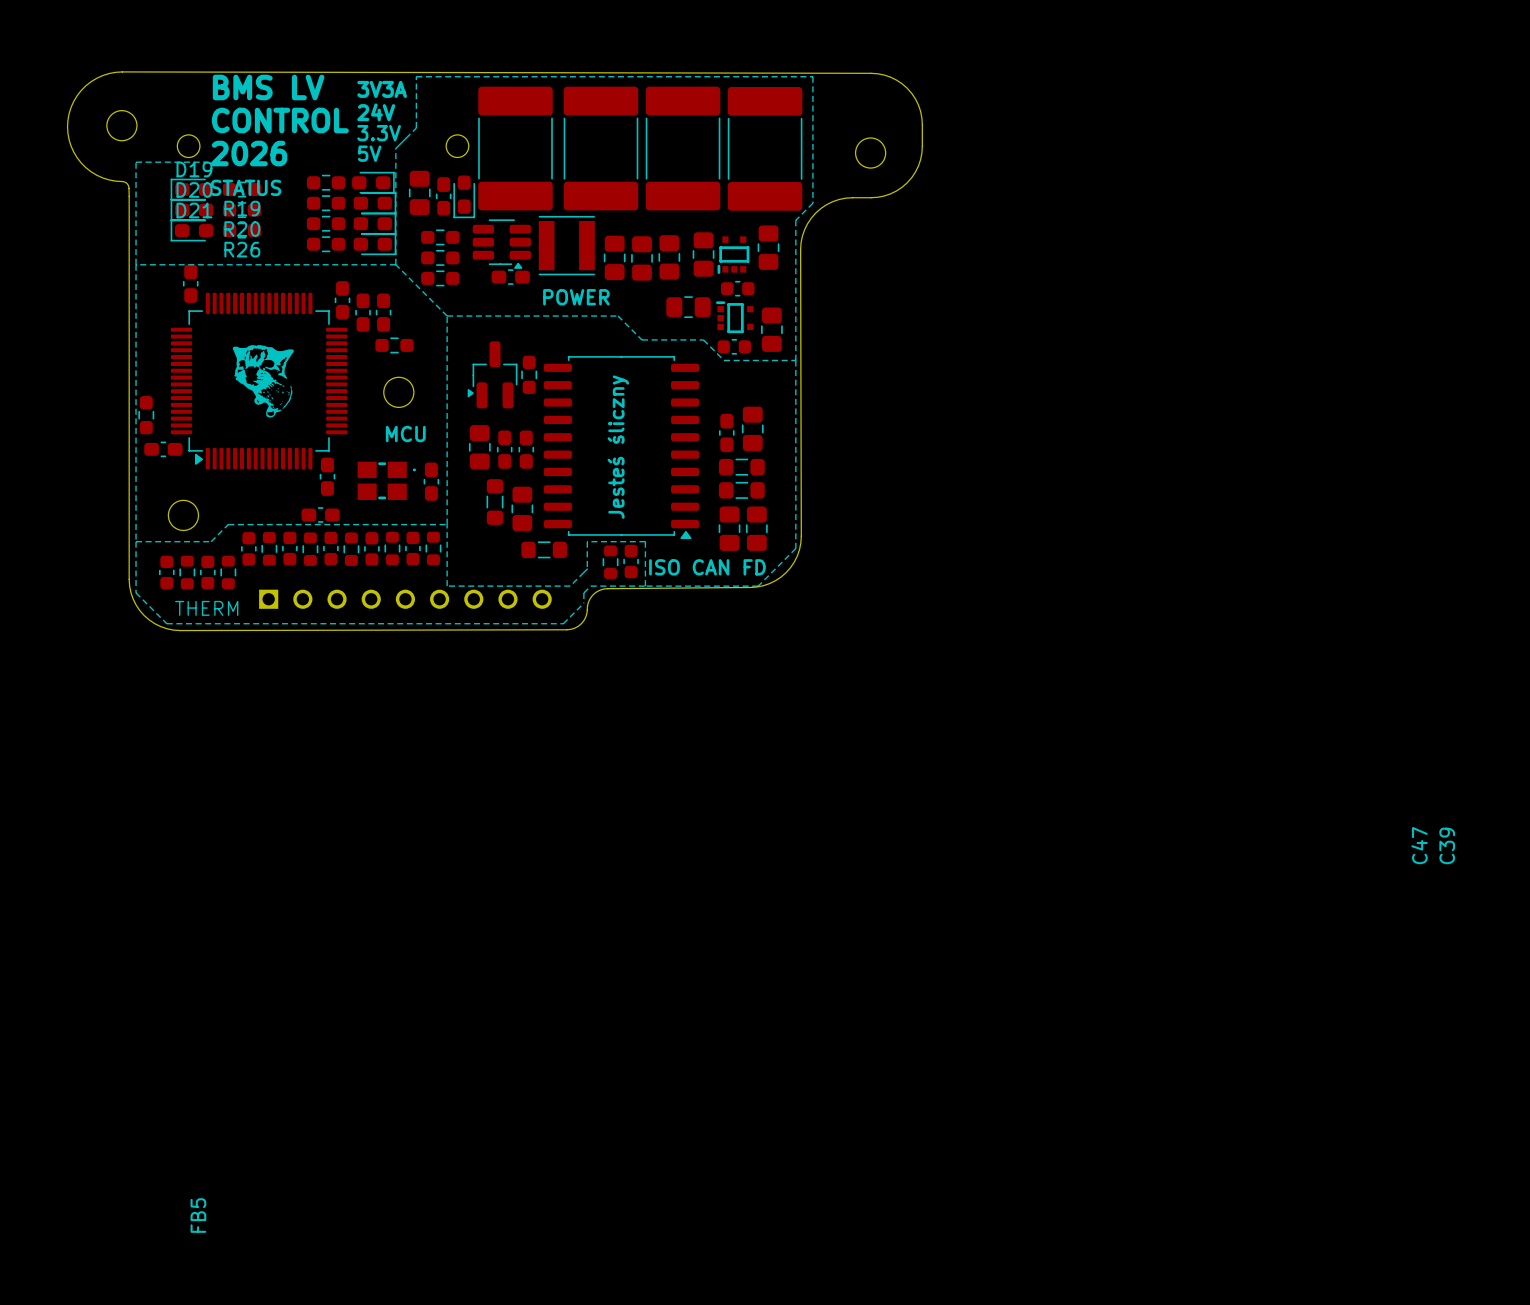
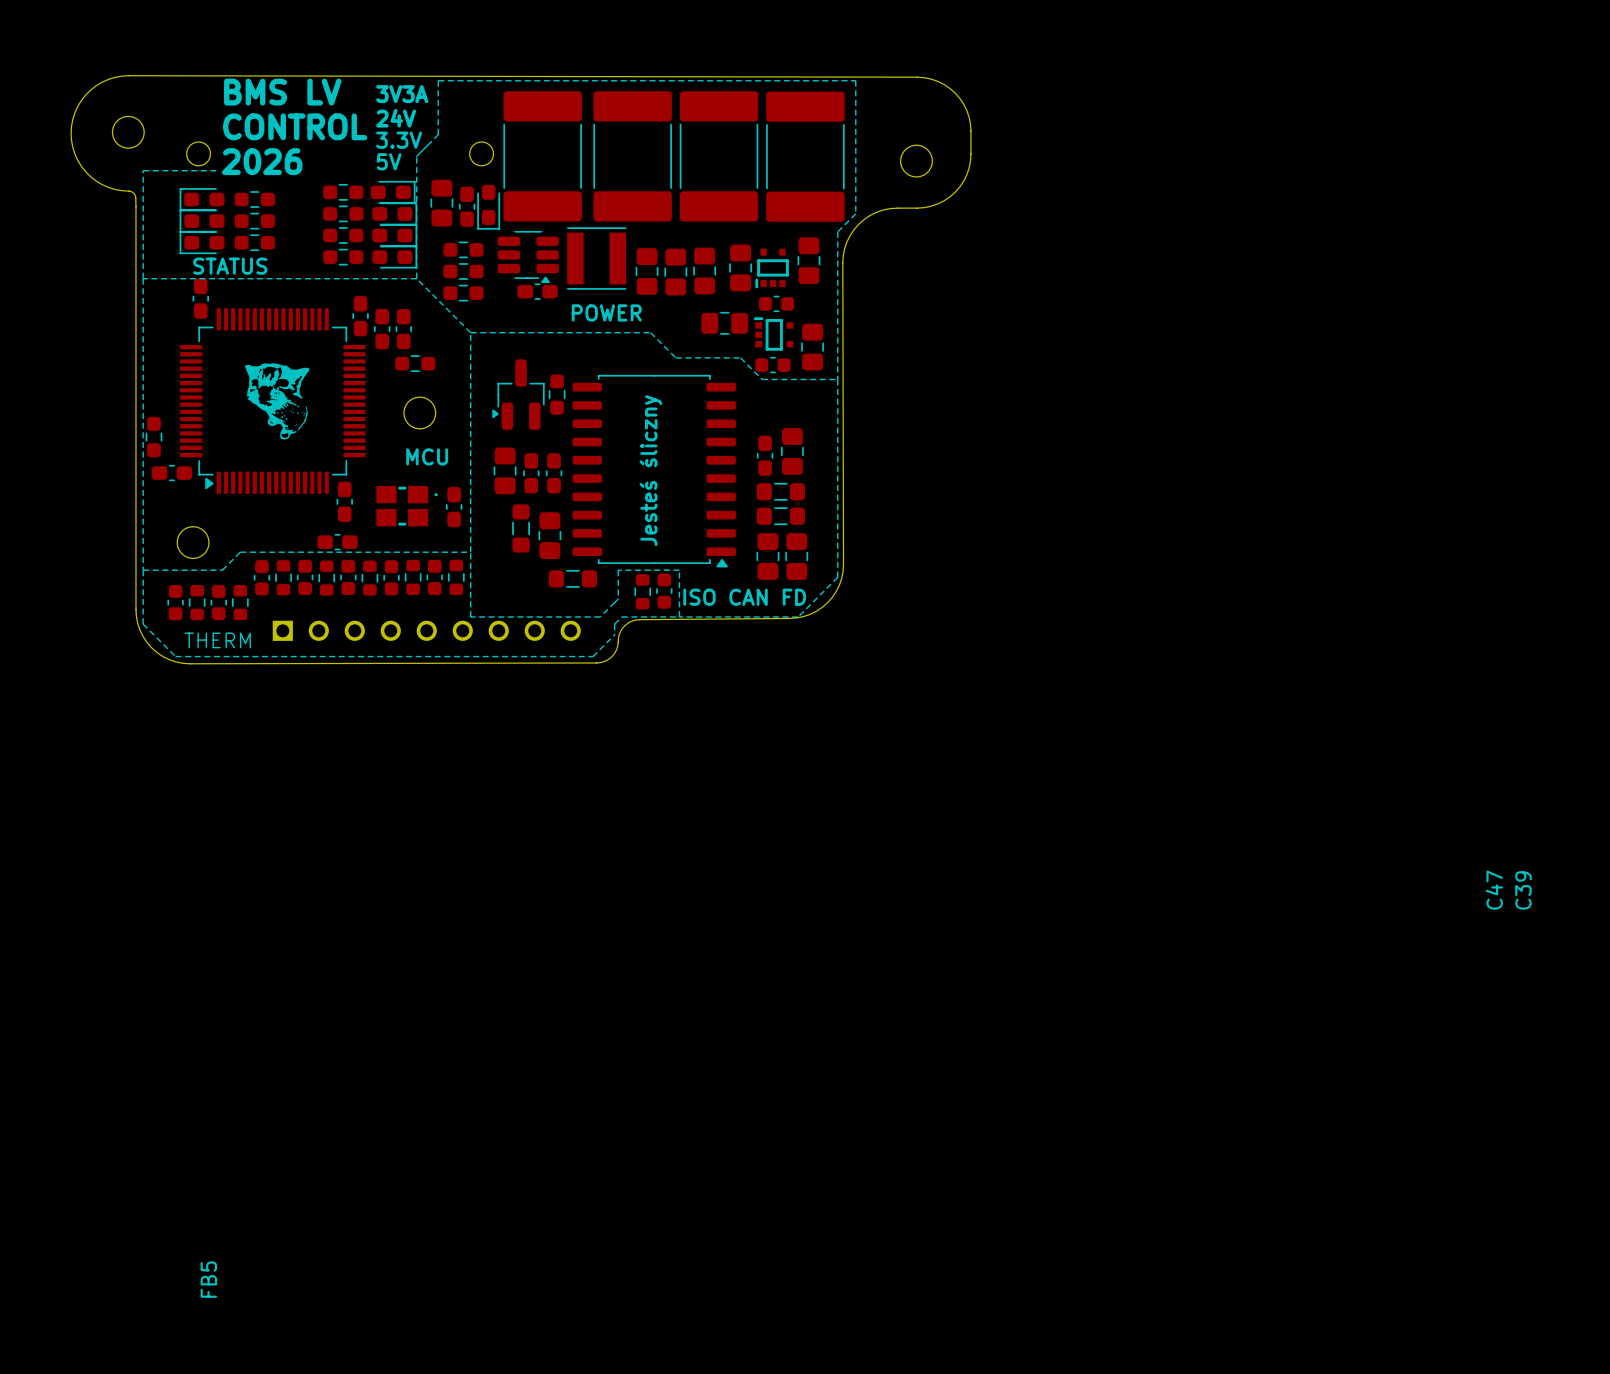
D19 name: D19 (194, 169) -> none
text position: STATUS (246, 187) -> STATUS (230, 266)
D20 name: D20 (194, 189) -> none
R19 name: R19 (242, 208) -> none
D21 name: D21 (194, 210) -> none
R20 name: R20 (242, 229) -> none
R26 name: R26 (242, 249) -> none

